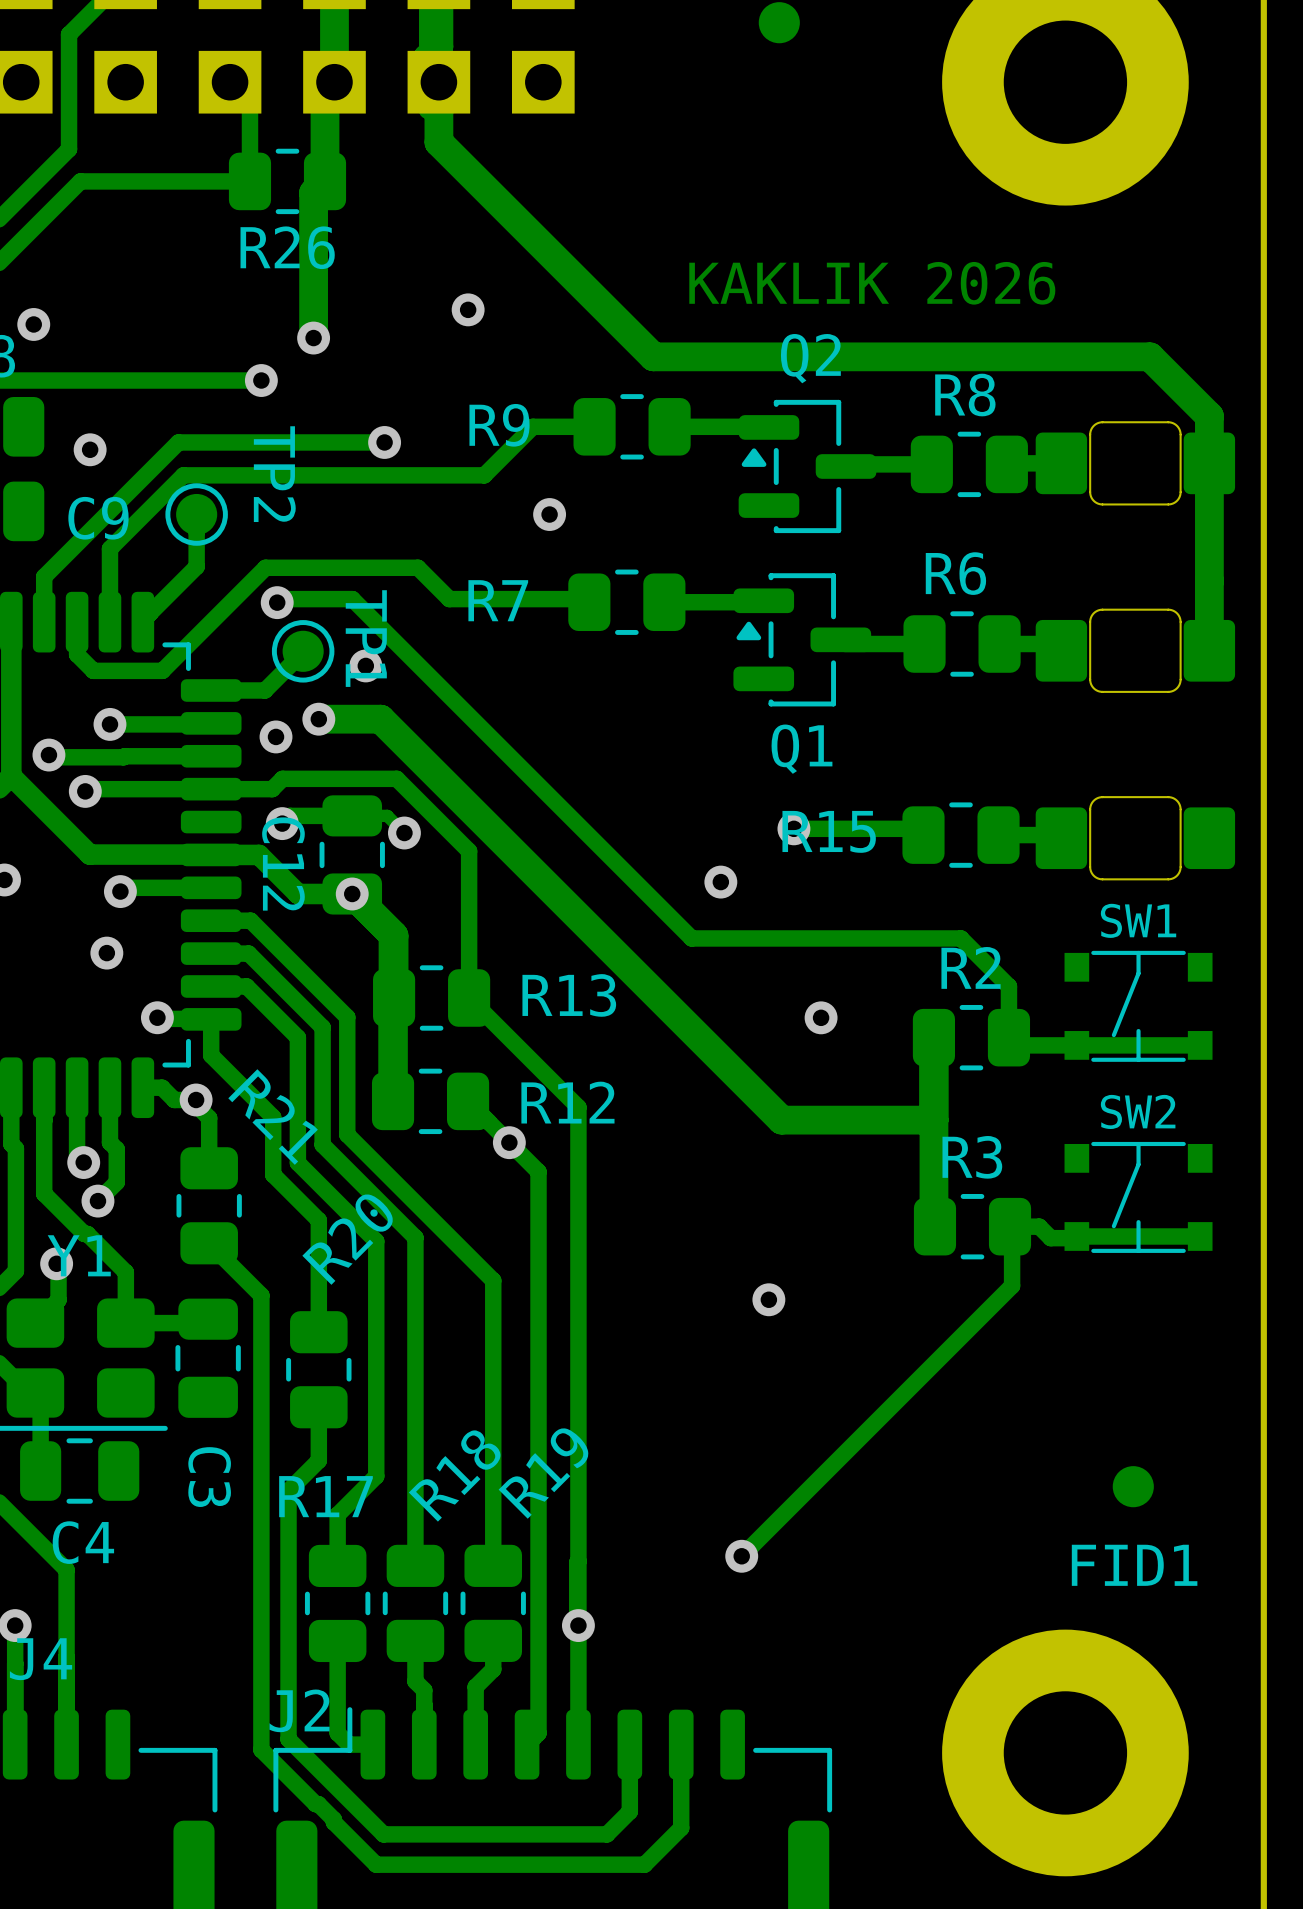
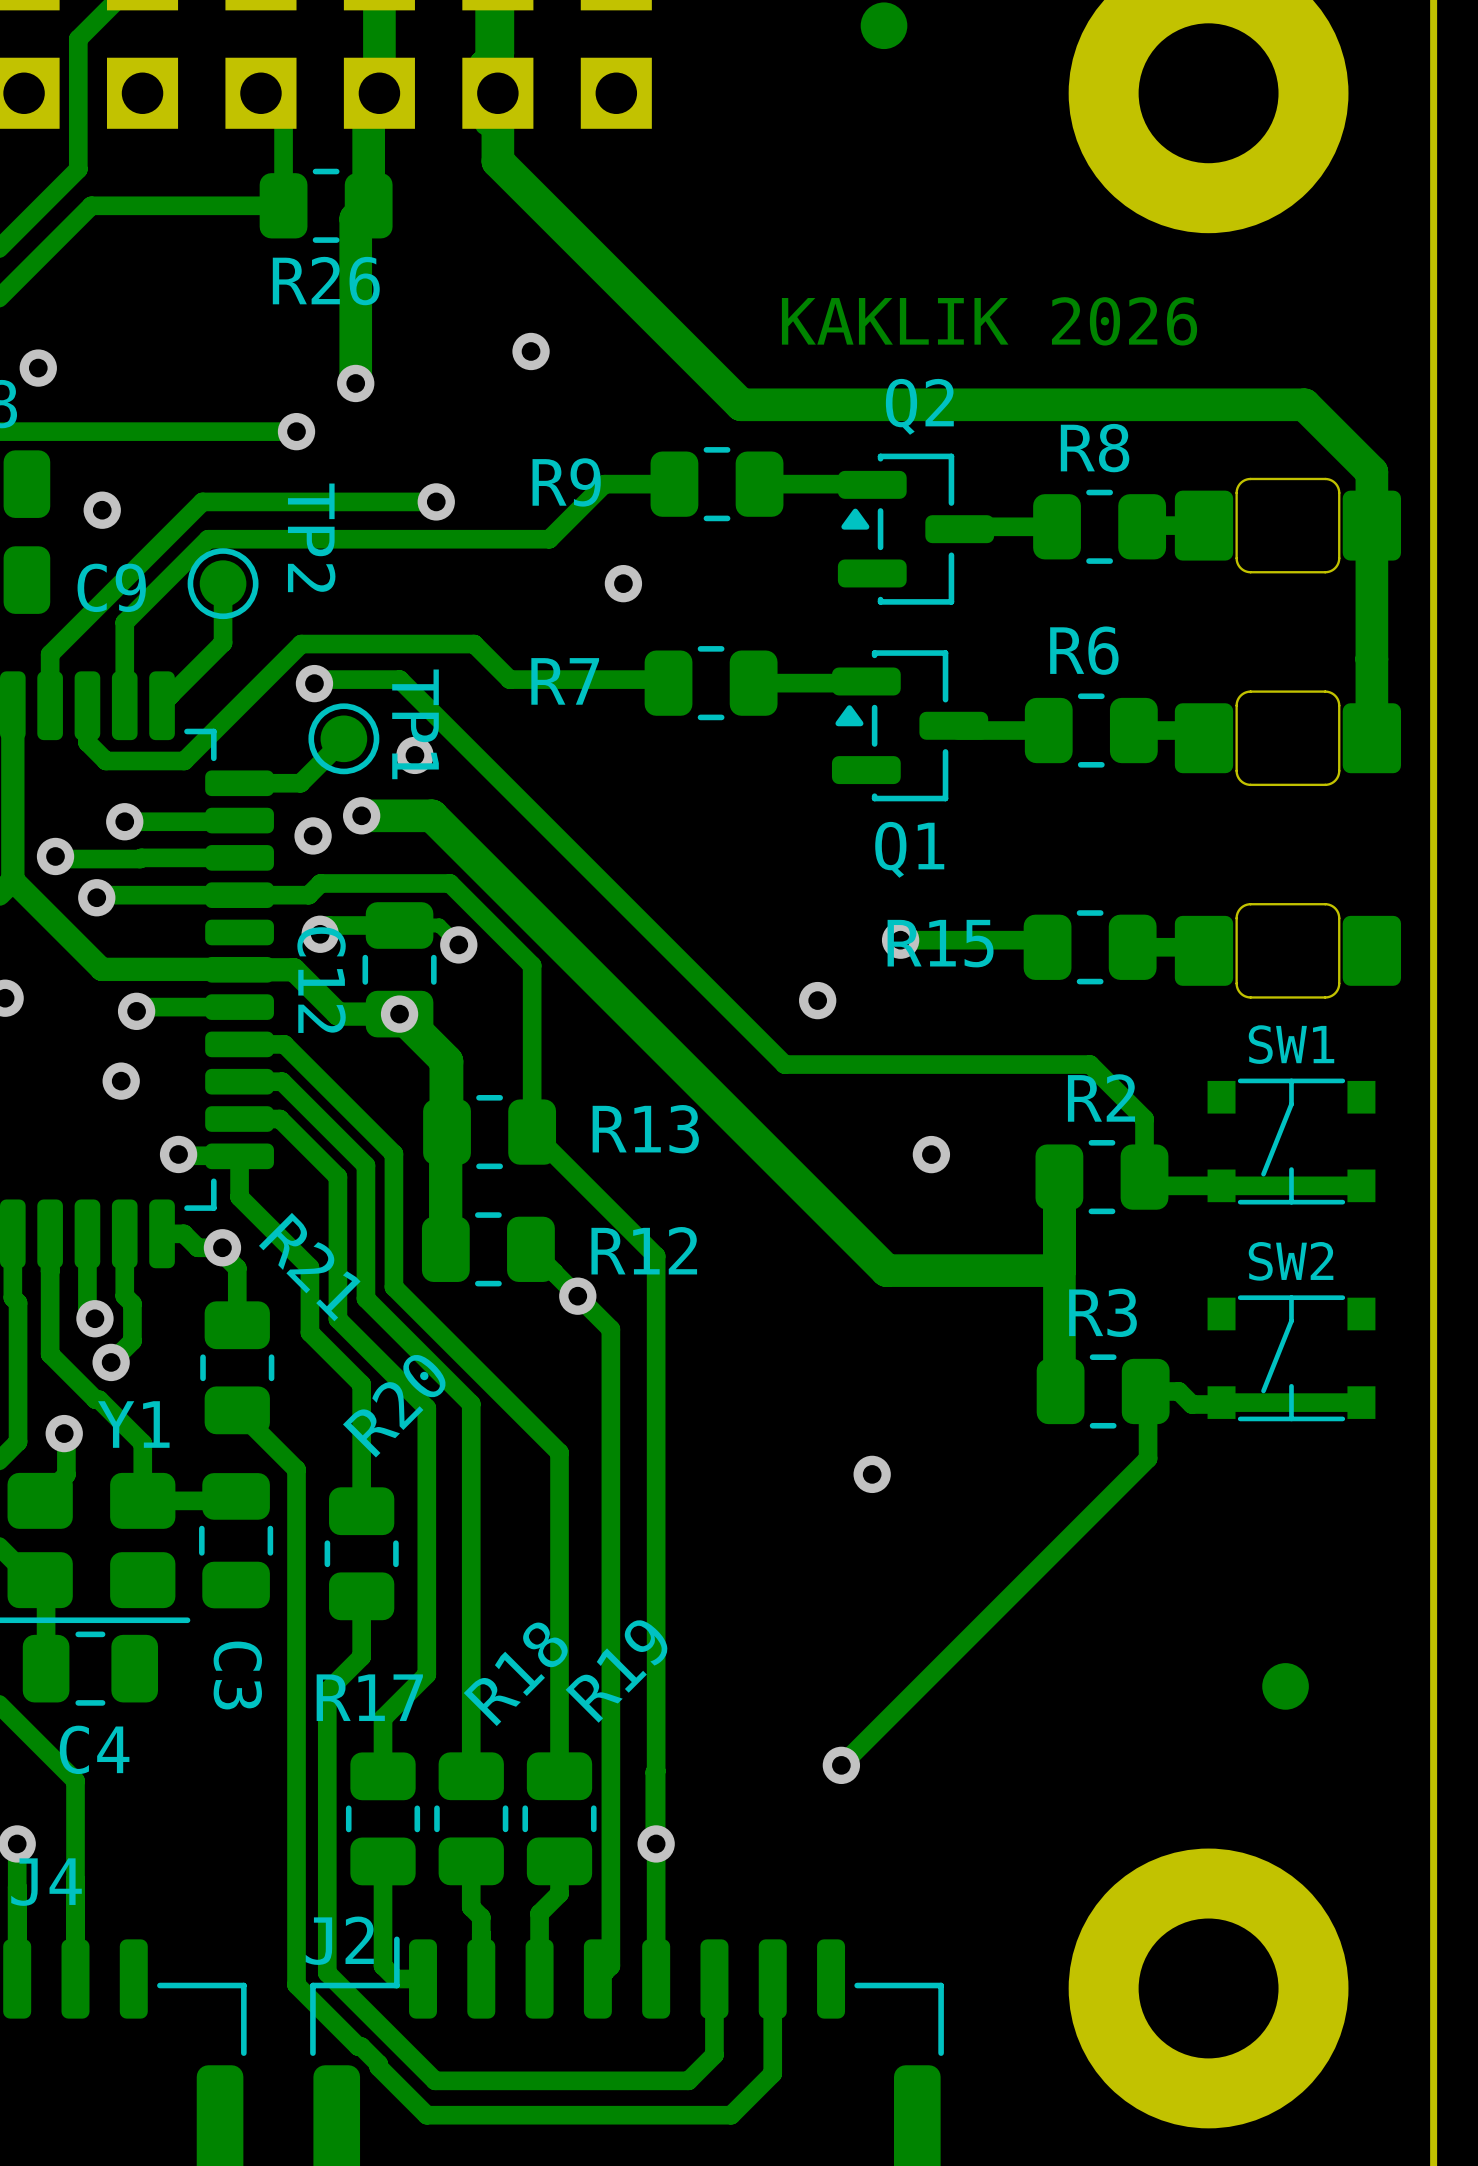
Y1 name position: Y1 (79, 1255) -> Y1 (133, 1424)
FID1 name: FID1 (1134, 1565) -> none

